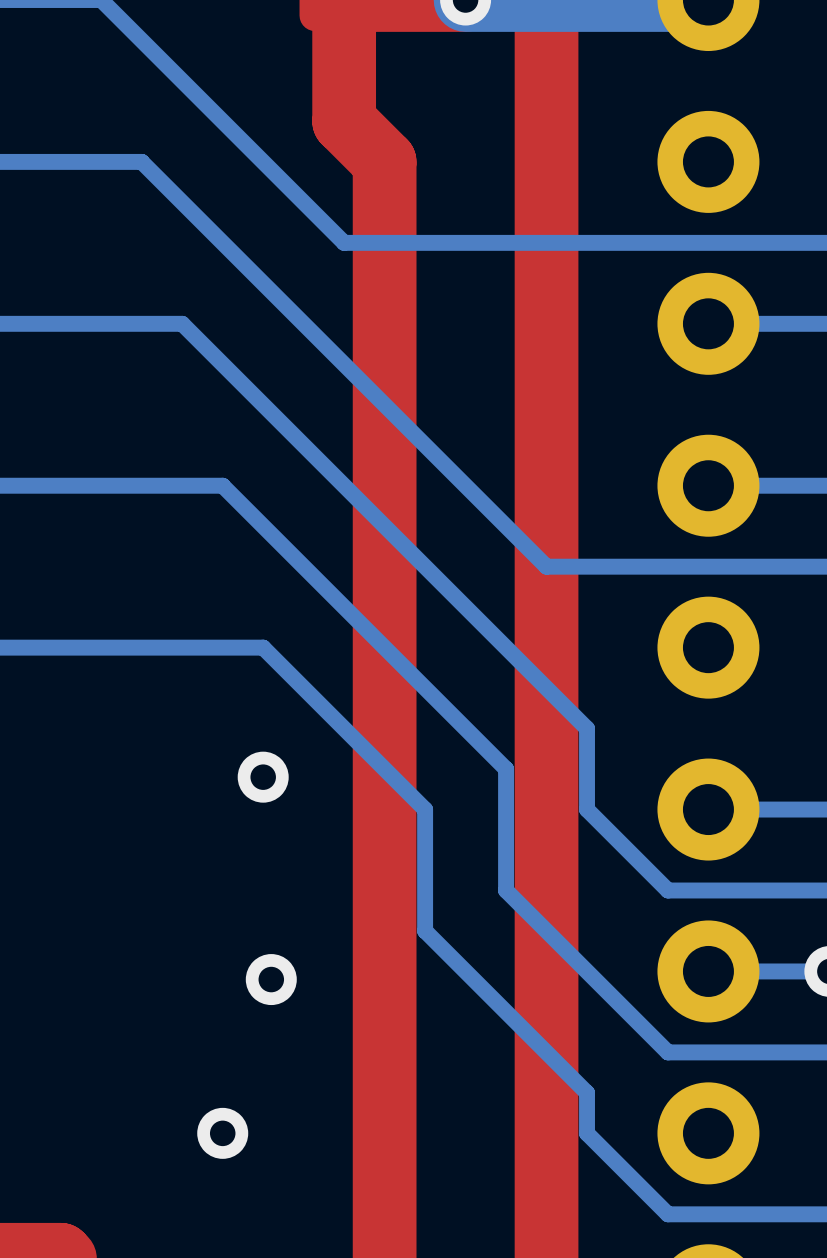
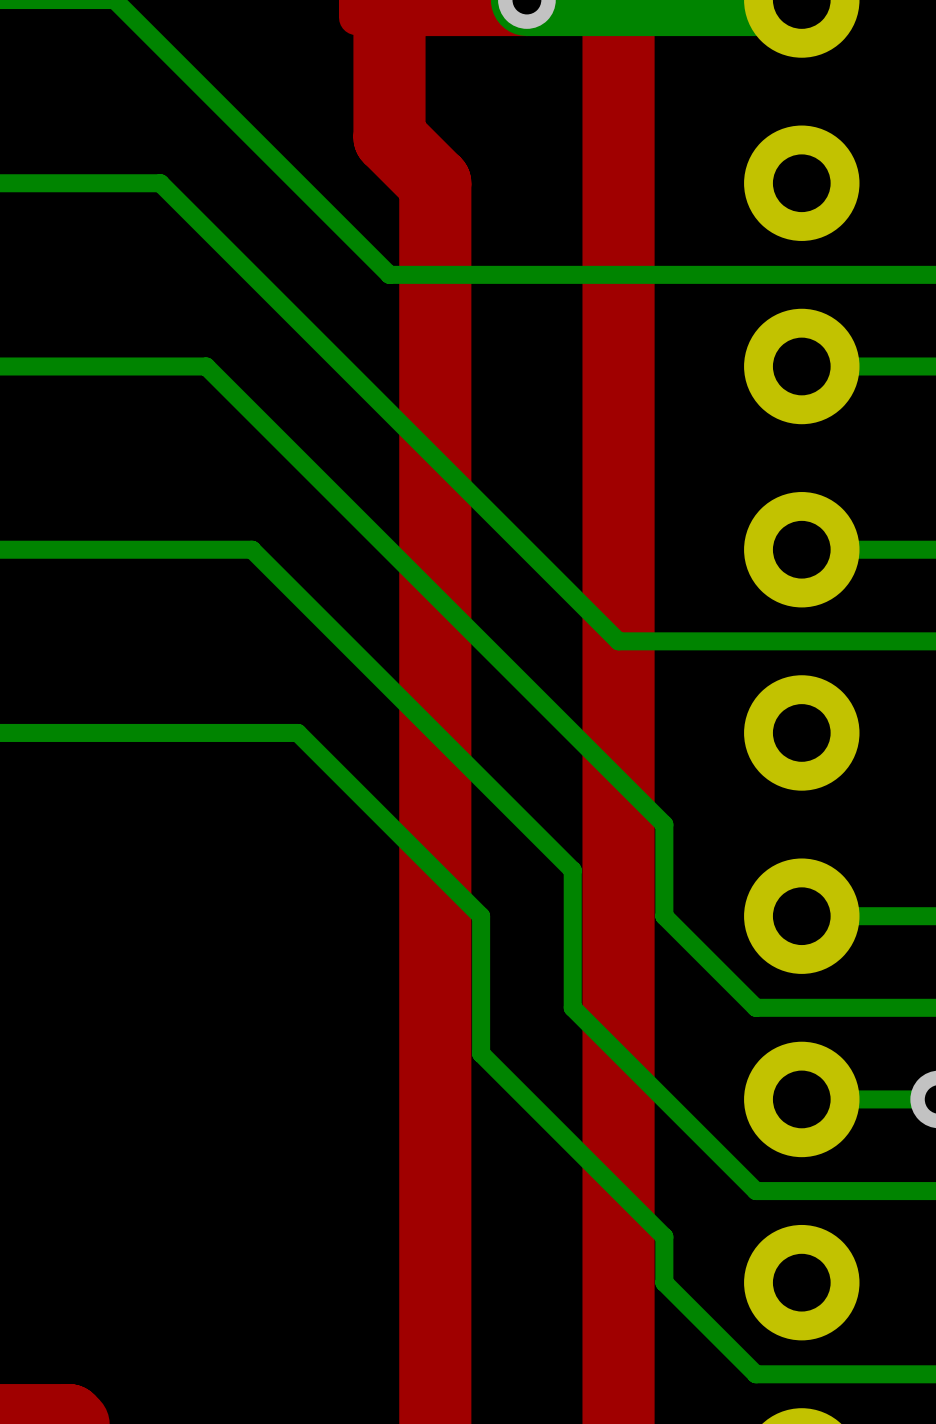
via: (263, 777) -> none
via: (271, 979) -> none
via: (222, 1133) -> none

